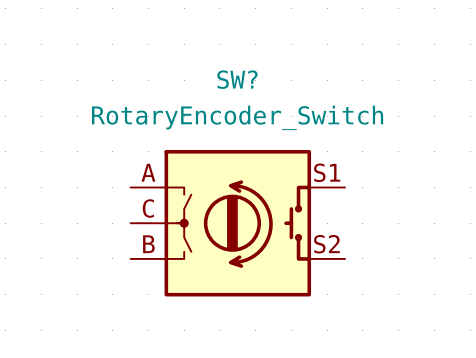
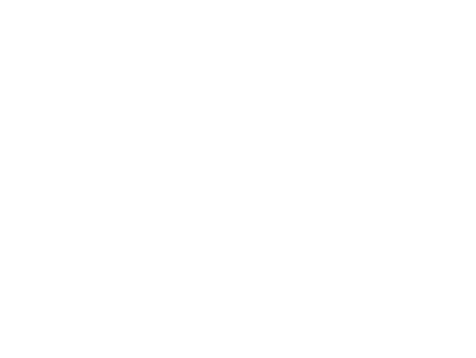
SW?: RotaryEncoder_Switch (237, 223) -> none

